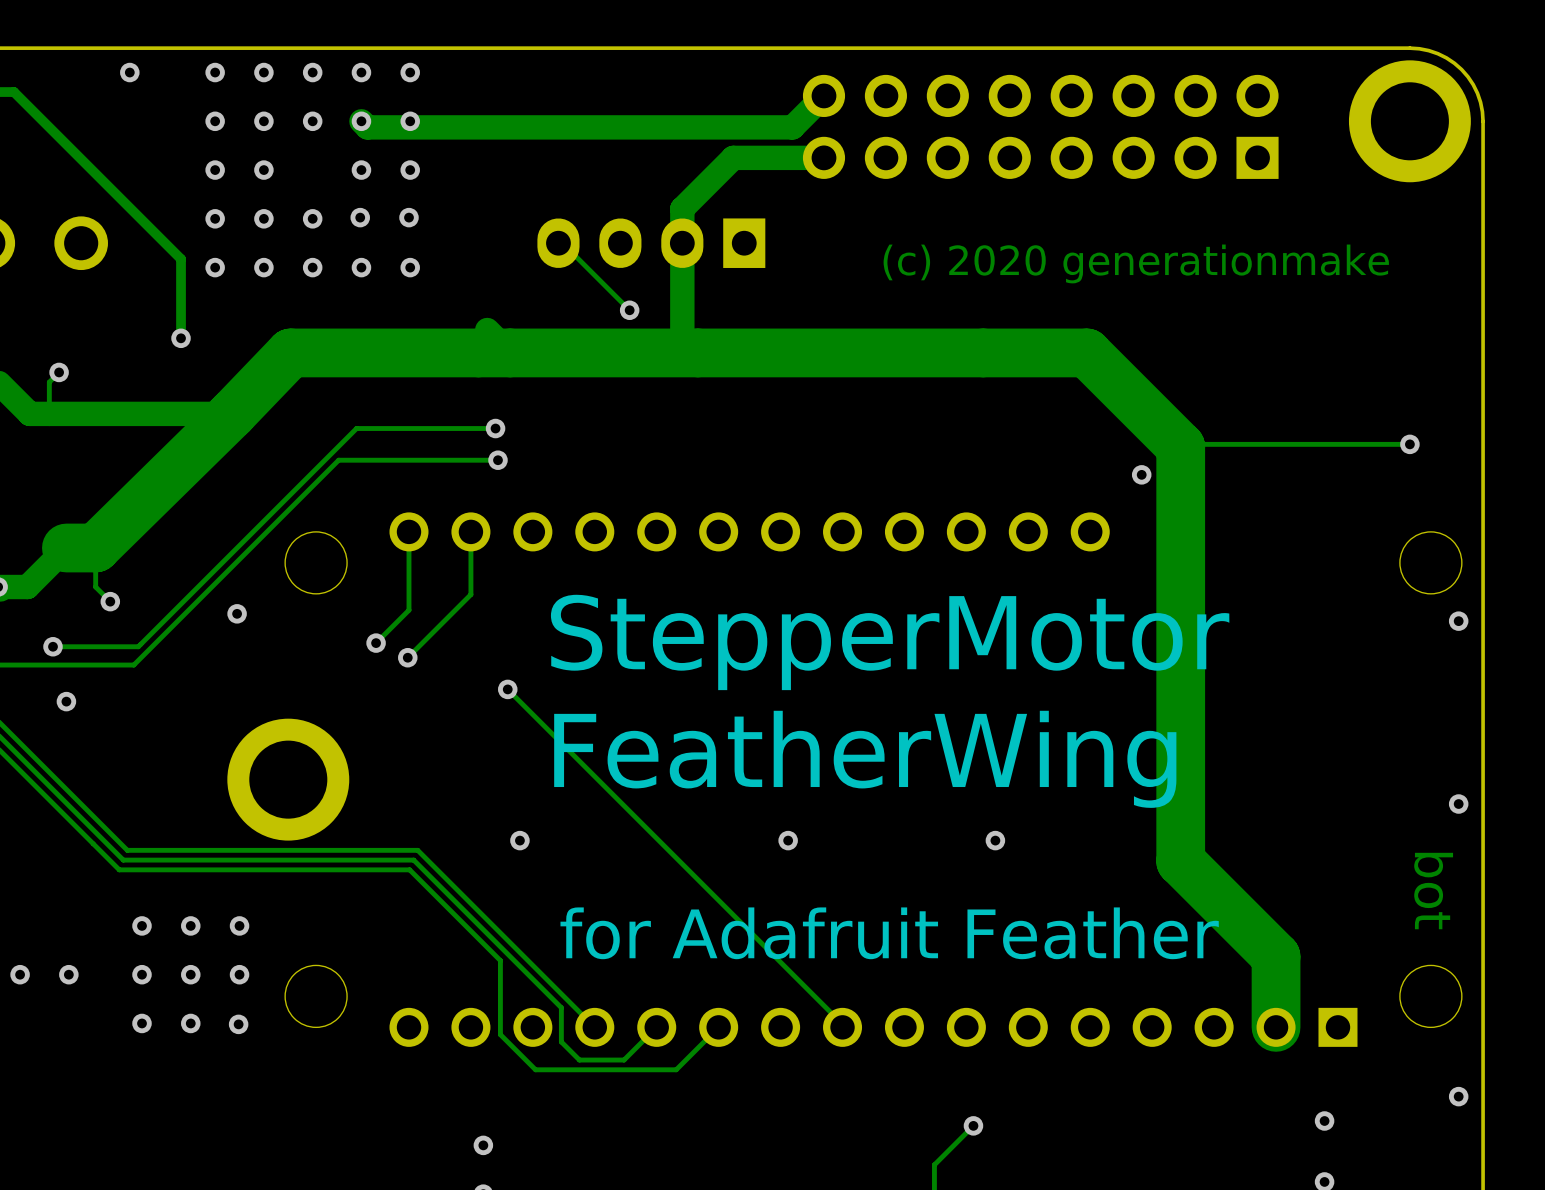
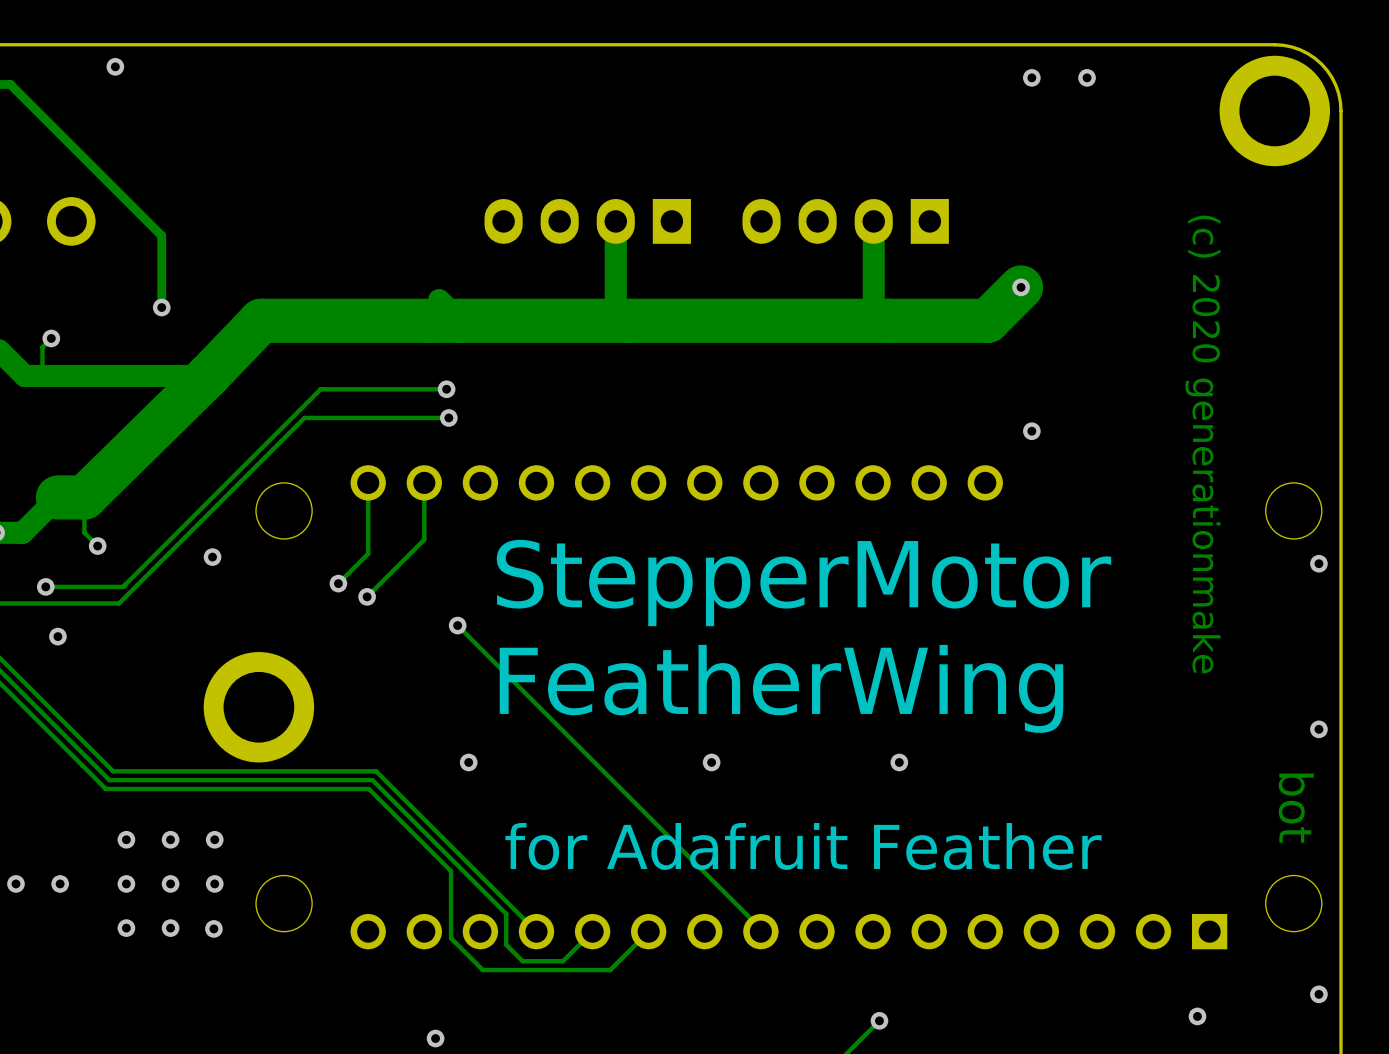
via: (215, 72) -> none
via: (263, 72) -> none
via: (312, 72) -> none
via: (361, 72) -> none
via: (410, 72) -> none
via: none -> (1031, 77)
via: none -> (1087, 77)
track: (823, 95) (792, 127) (367, 127) (361, 121) -> none
via: (215, 121) -> none
via: (263, 121) -> none
via: (312, 121) -> none
via: (361, 121) -> none
via: (410, 121) -> none
part: (1040, 126) -> none
track: (823, 157) (733, 157) (682, 208) (682, 243) -> none
via: (215, 170) -> none
via: (263, 170) -> none
via: (361, 170) -> none
via: (410, 170) -> none
via: (360, 217) -> none
via: (408, 217) -> none
via: (215, 218) -> none
via: (263, 218) -> none
via: (312, 218) -> none
track: (558, 243) (562, 243) (629, 310) -> none
part: none -> (845, 221)
track: none -> (873, 221) (873, 306) (888, 320)
text rotation: 0° (1136, 263) -> 90° clockwise (1202, 444)
via: (215, 267) -> none
via: (263, 267) -> none
via: (312, 267) -> none
via: (361, 267) -> none
via: (410, 267) -> none
via: (629, 310) -> none
via: none -> (1021, 287)
track: (1086, 352) (1180, 446) -> (982, 320) (987, 320) (1021, 287)
track: (1409, 444) (1183, 444) (1180, 446) -> none
via: (1409, 444) -> none
track: (1180, 446) (1180, 861) (1276, 956) (1276, 1027) -> none

